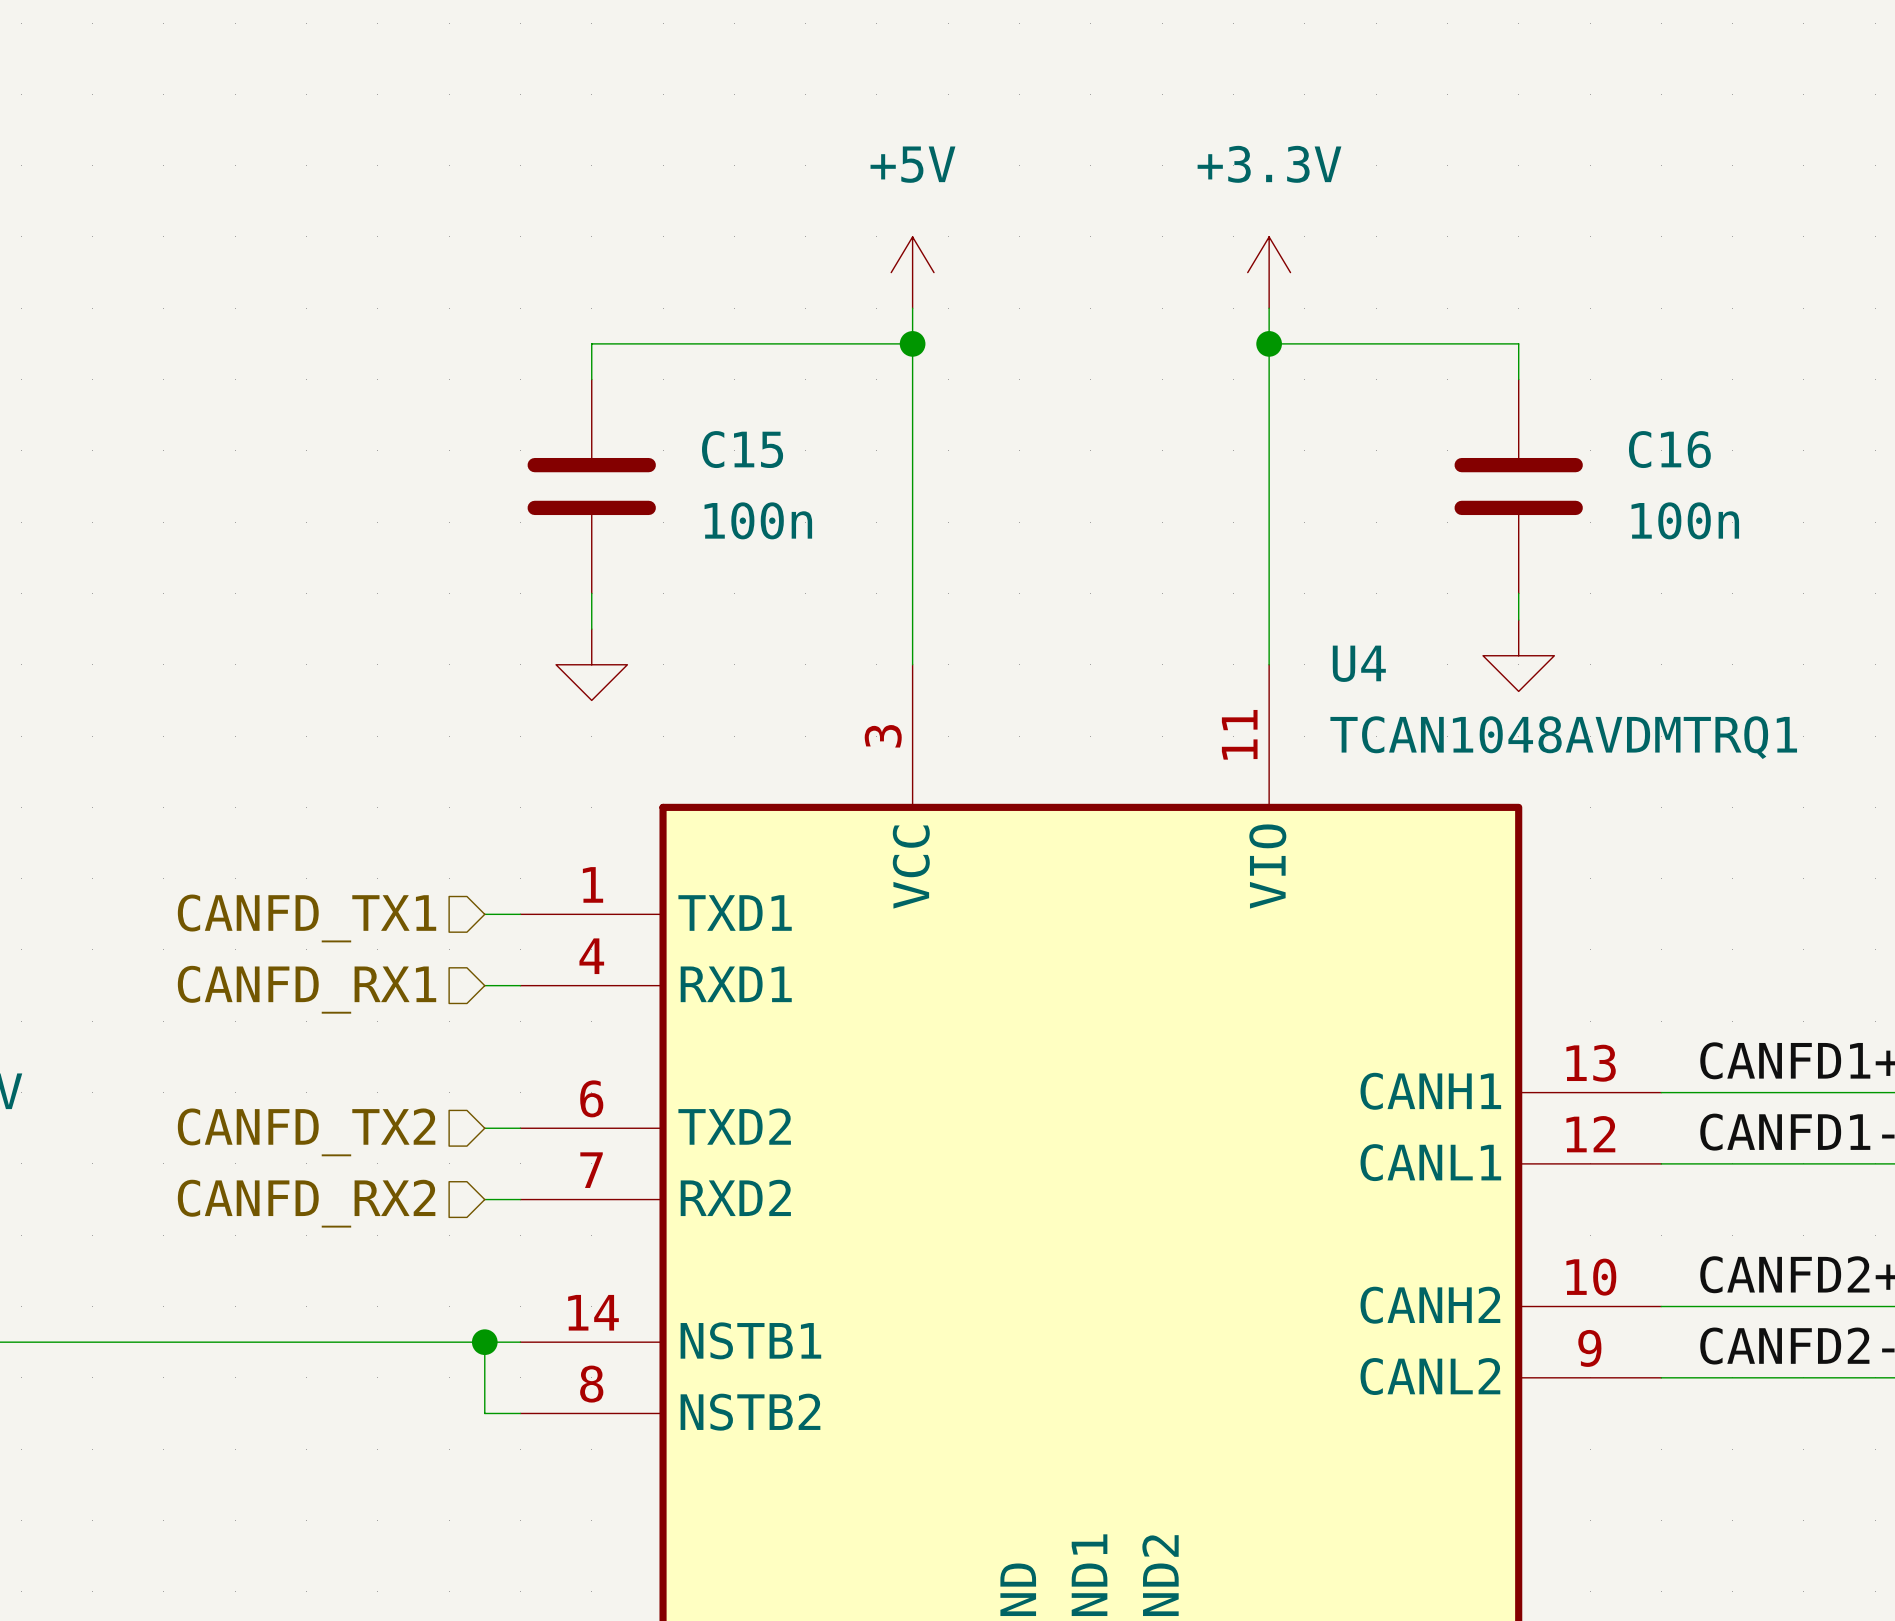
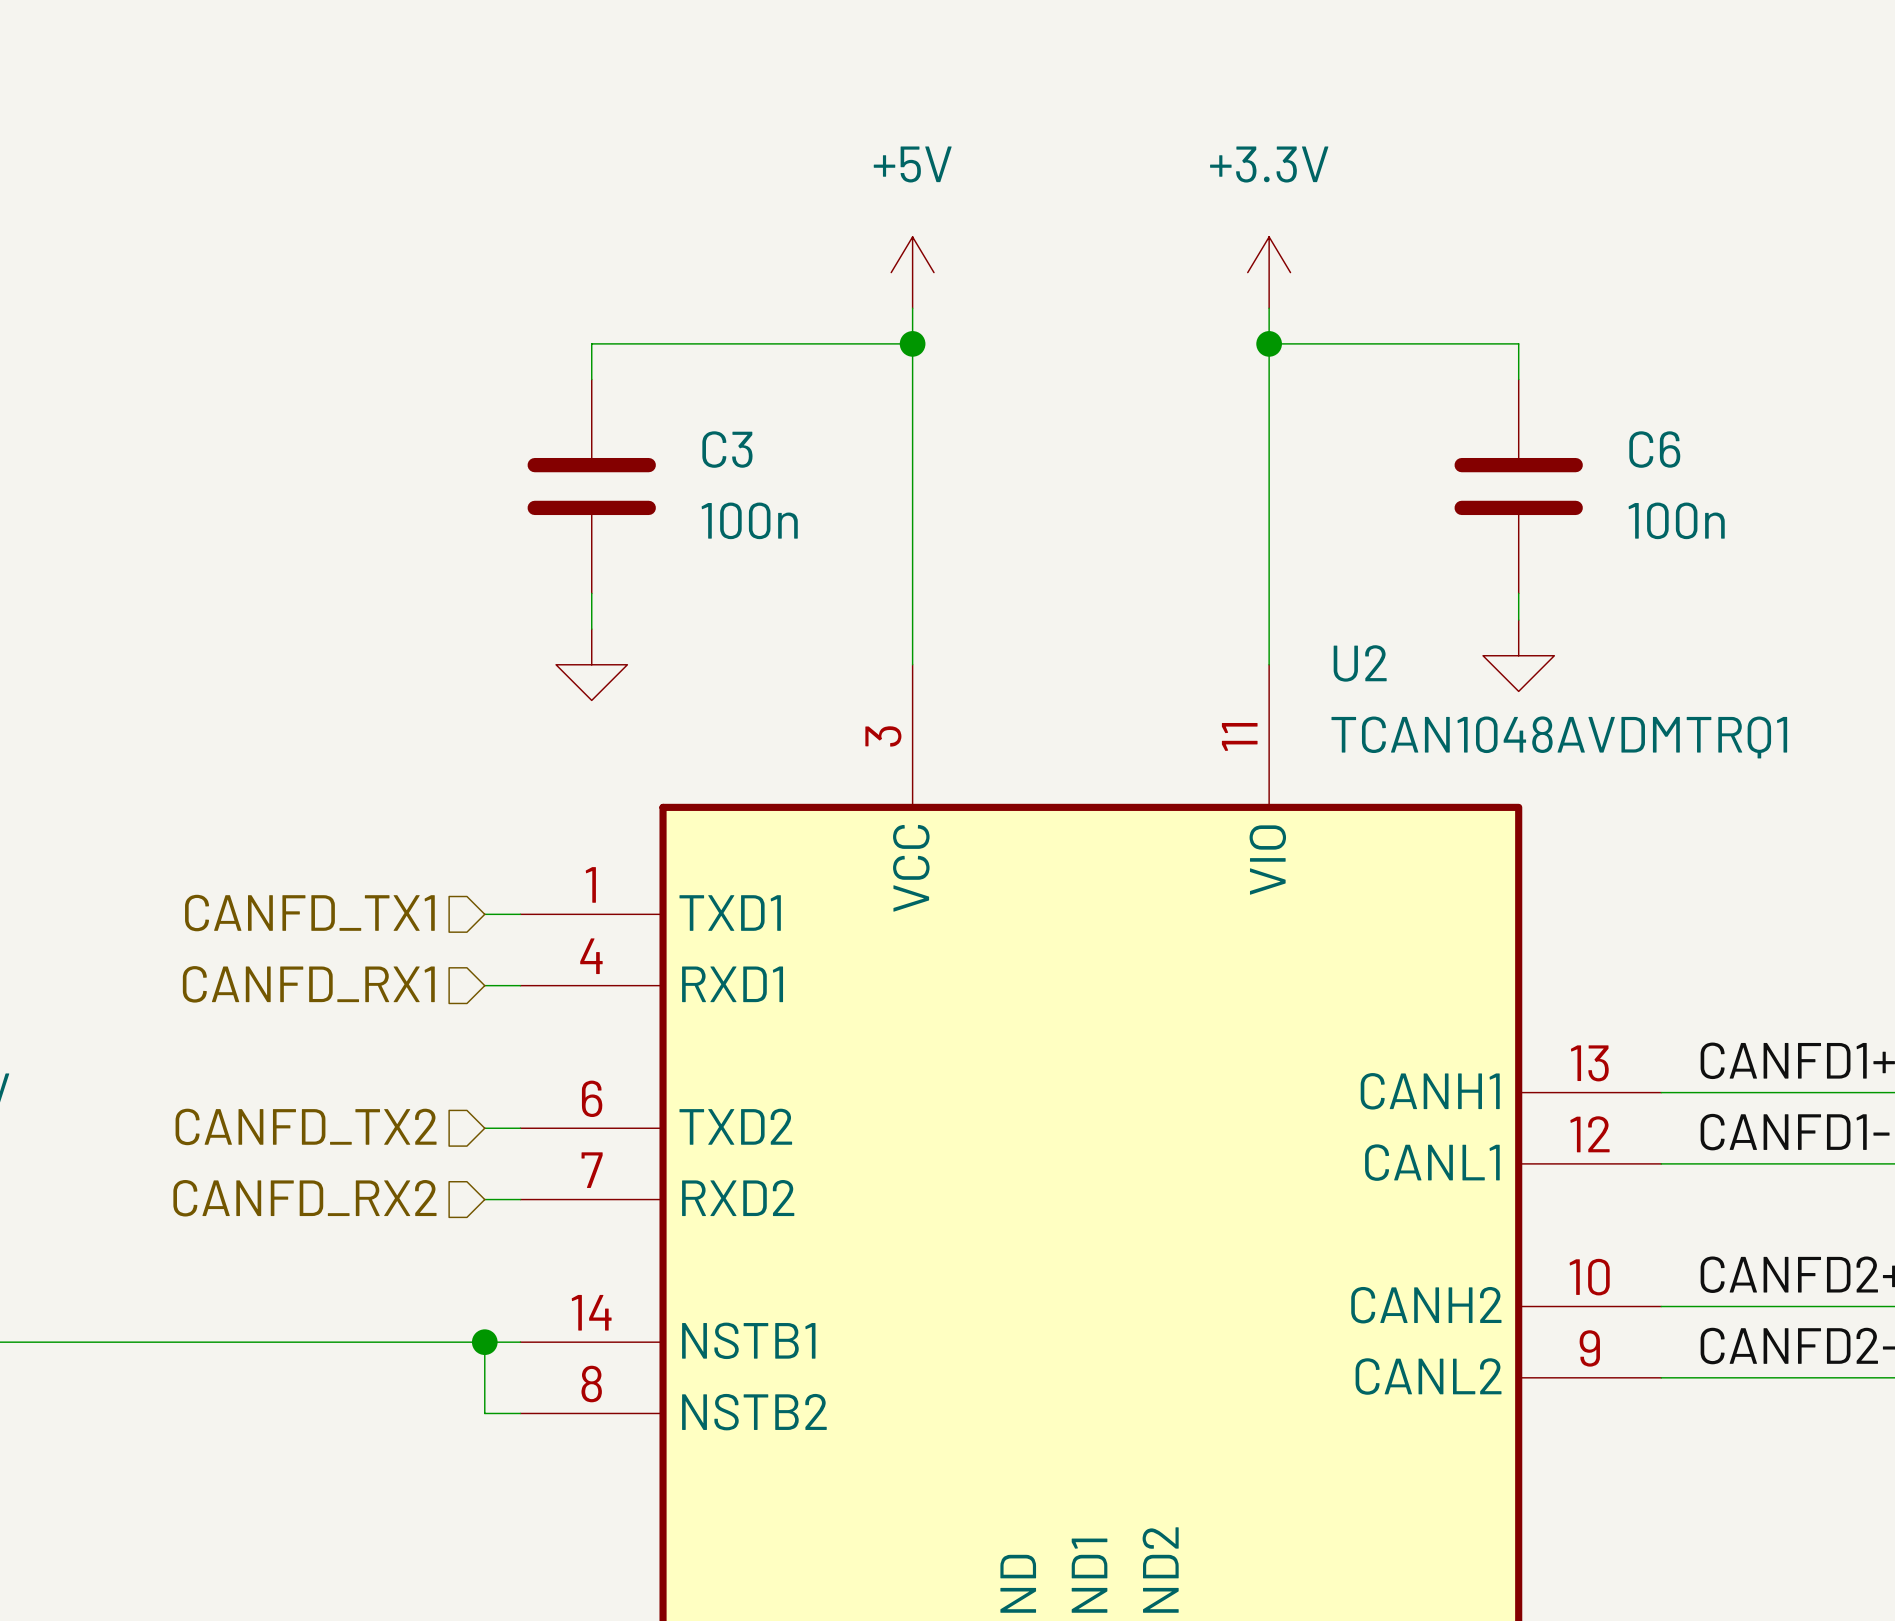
C15 name: C15 (742, 449) -> C3 (727, 449)
C16 name: C16 (1669, 449) -> C6 (1654, 449)
U4 name: U4 (1359, 663) -> U2 (1360, 663)

